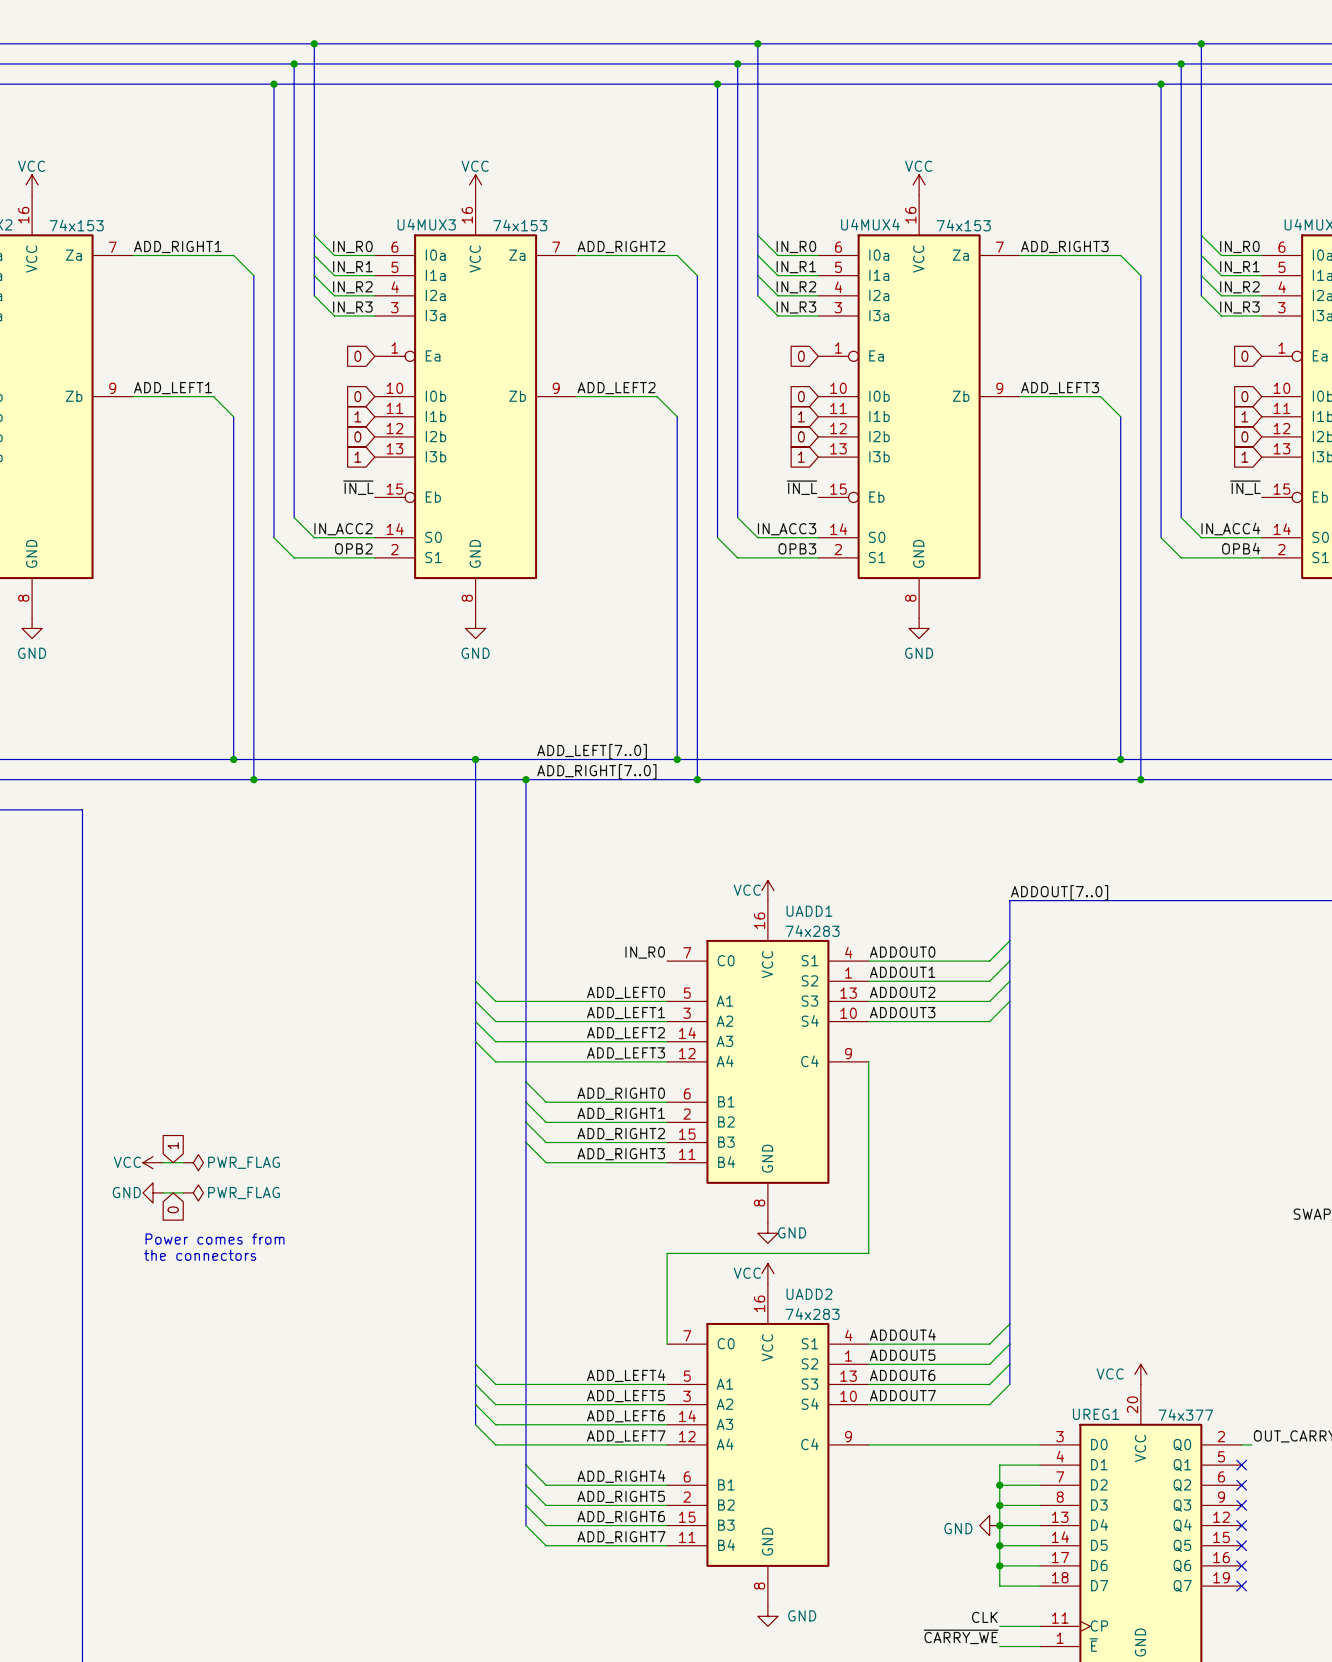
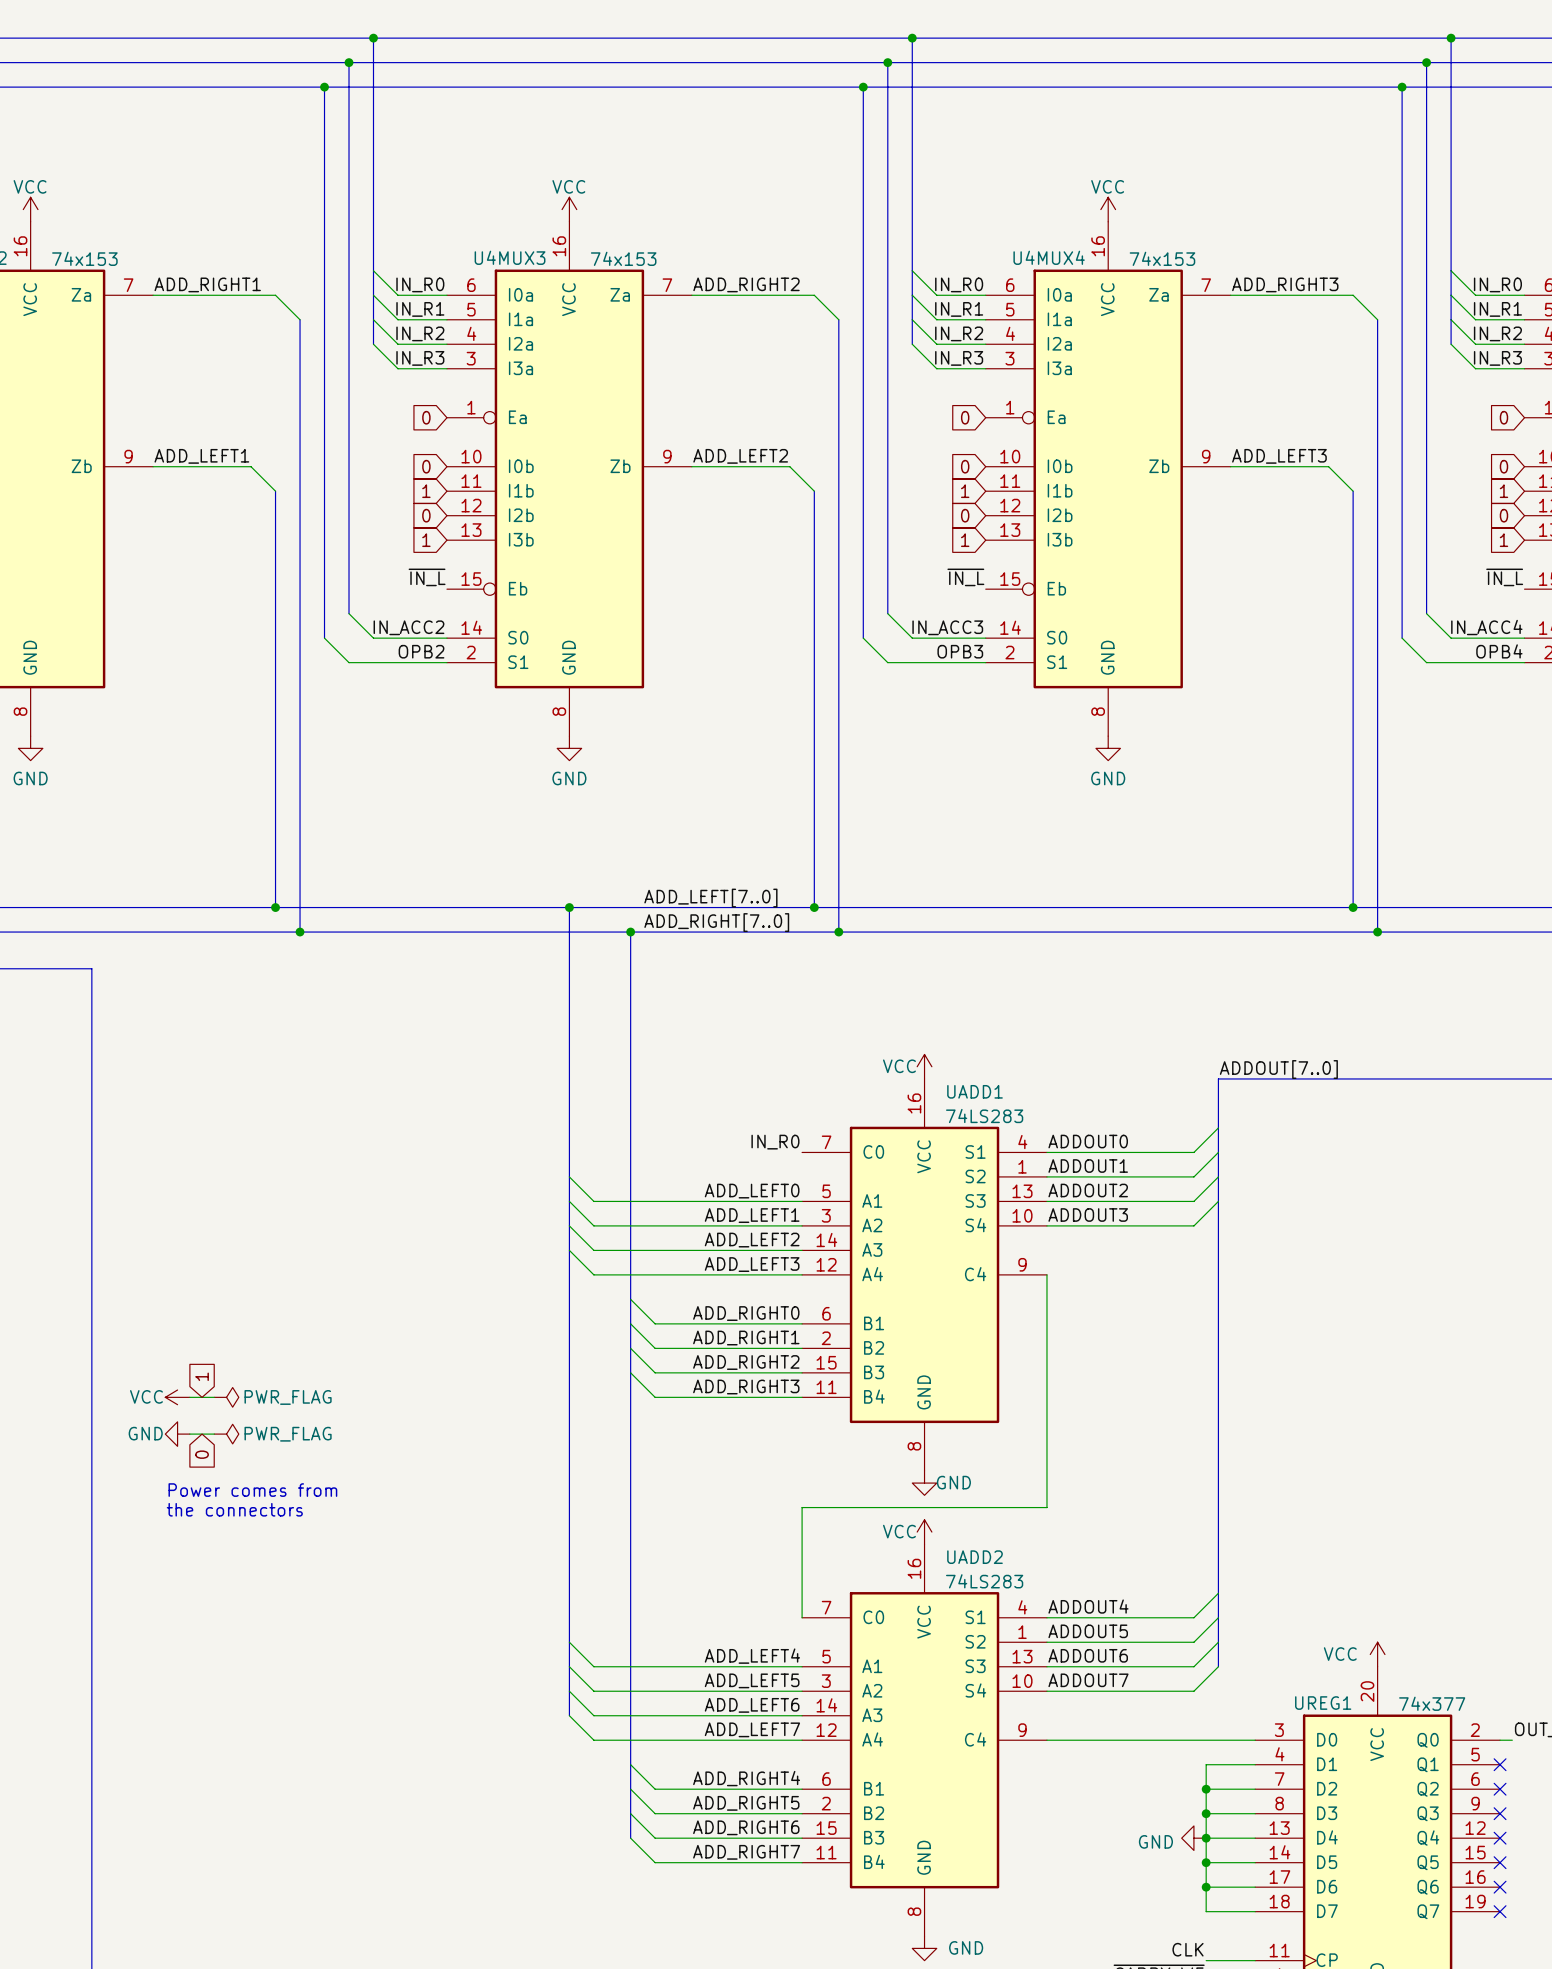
UADD1 value: 74x283 (812, 931) -> 74LS283 (984, 1116)
UADD2 value: 74x283 (812, 1314) -> 74LS283 (984, 1581)

